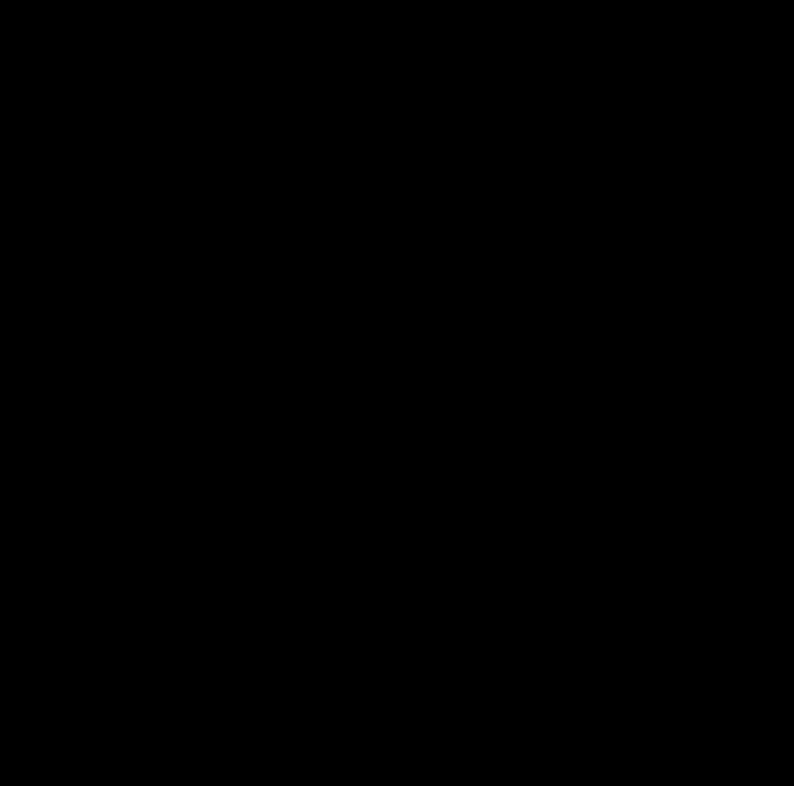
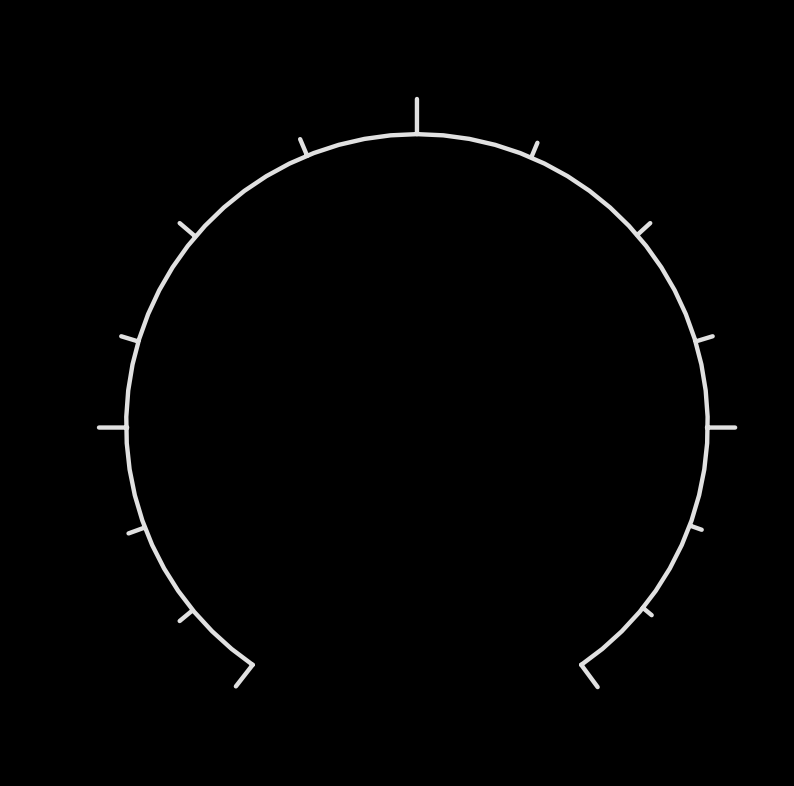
line: none -> (416, 98) (416, 134)
line: none -> (300, 139) (307, 155)
line: none -> (537, 142) (531, 156)
line: none -> (179, 223) (194, 235)
line: none -> (650, 223) (637, 234)
line: none -> (121, 336) (138, 341)
line: none -> (712, 336) (695, 341)
line: none -> (98, 427) (127, 427)
line: none -> (706, 427) (735, 427)
line: none -> (690, 525) (701, 529)
line: none -> (144, 527) (128, 533)
line: none -> (642, 607) (651, 615)
line: none -> (192, 610) (179, 621)
line: none -> (235, 686) (252, 664) (212, 631) (178, 590) (152, 545) (134, 495) (129, 469) (126, 416) (128, 390) (139, 338) (159, 290) (172, 267) (204, 225) (244, 190) (289, 163) (313, 153) (364, 138) (416, 134) (469, 138) (520, 153) (567, 176) (589, 190) (610, 207) (646, 245) (674, 290) (694, 338) (701, 364) (707, 416) (704, 469) (699, 495) (681, 545) (655, 590) (621, 631) (581, 664) (597, 687)

